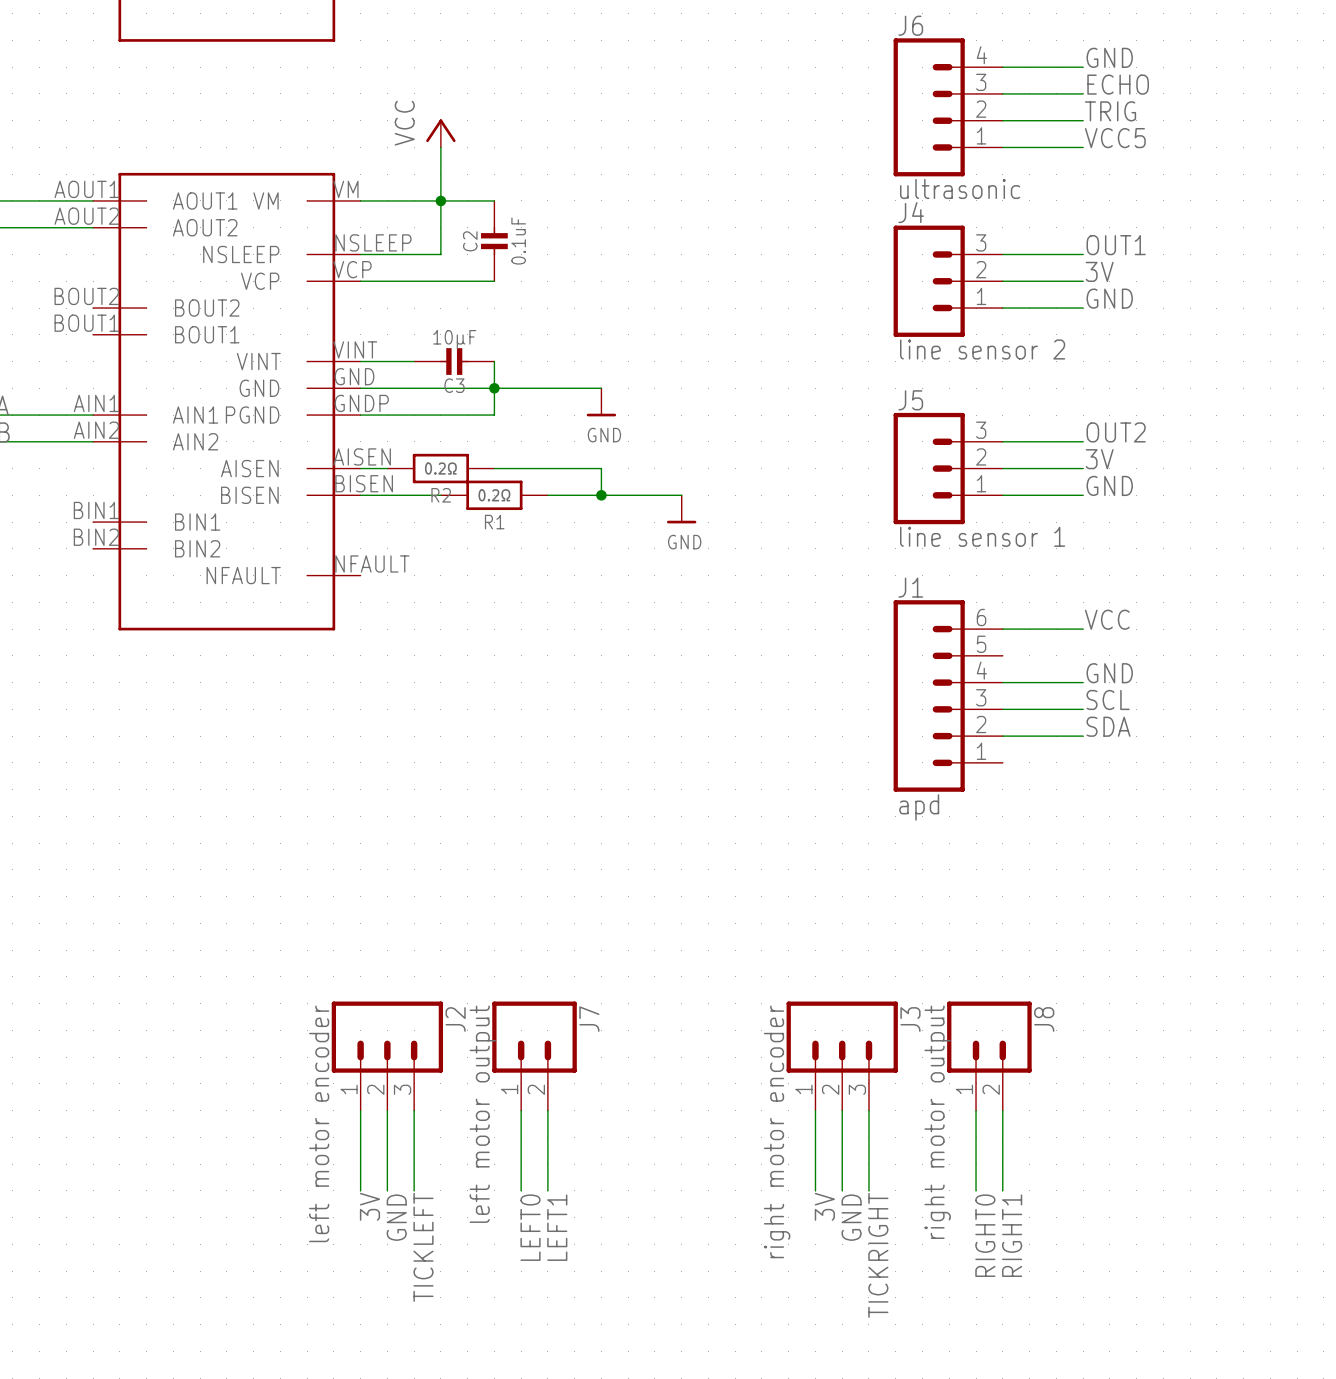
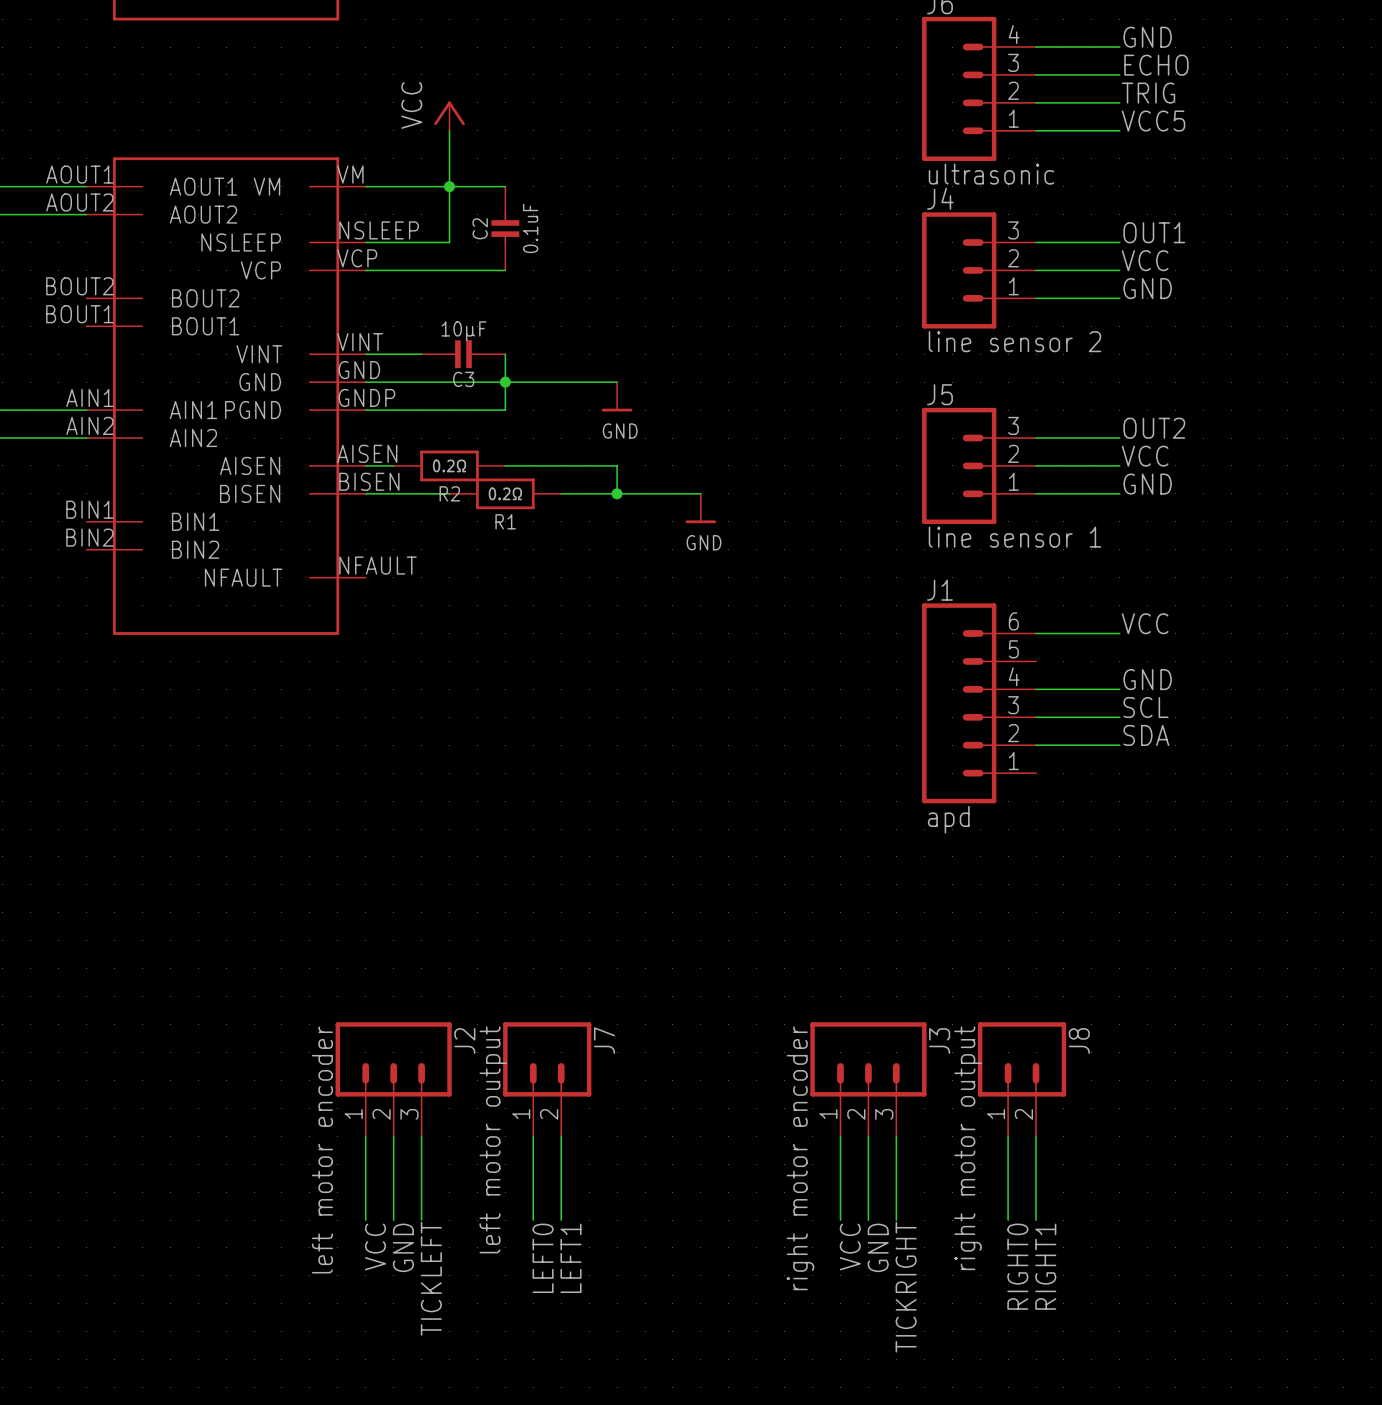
label: 3V (1099, 271) -> VCC (1145, 260)
label: 3V (1099, 459) -> VCC (1145, 456)
label: 3V (369, 1206) -> VCC (375, 1247)
label: 3V (824, 1206) -> VCC (850, 1247)

